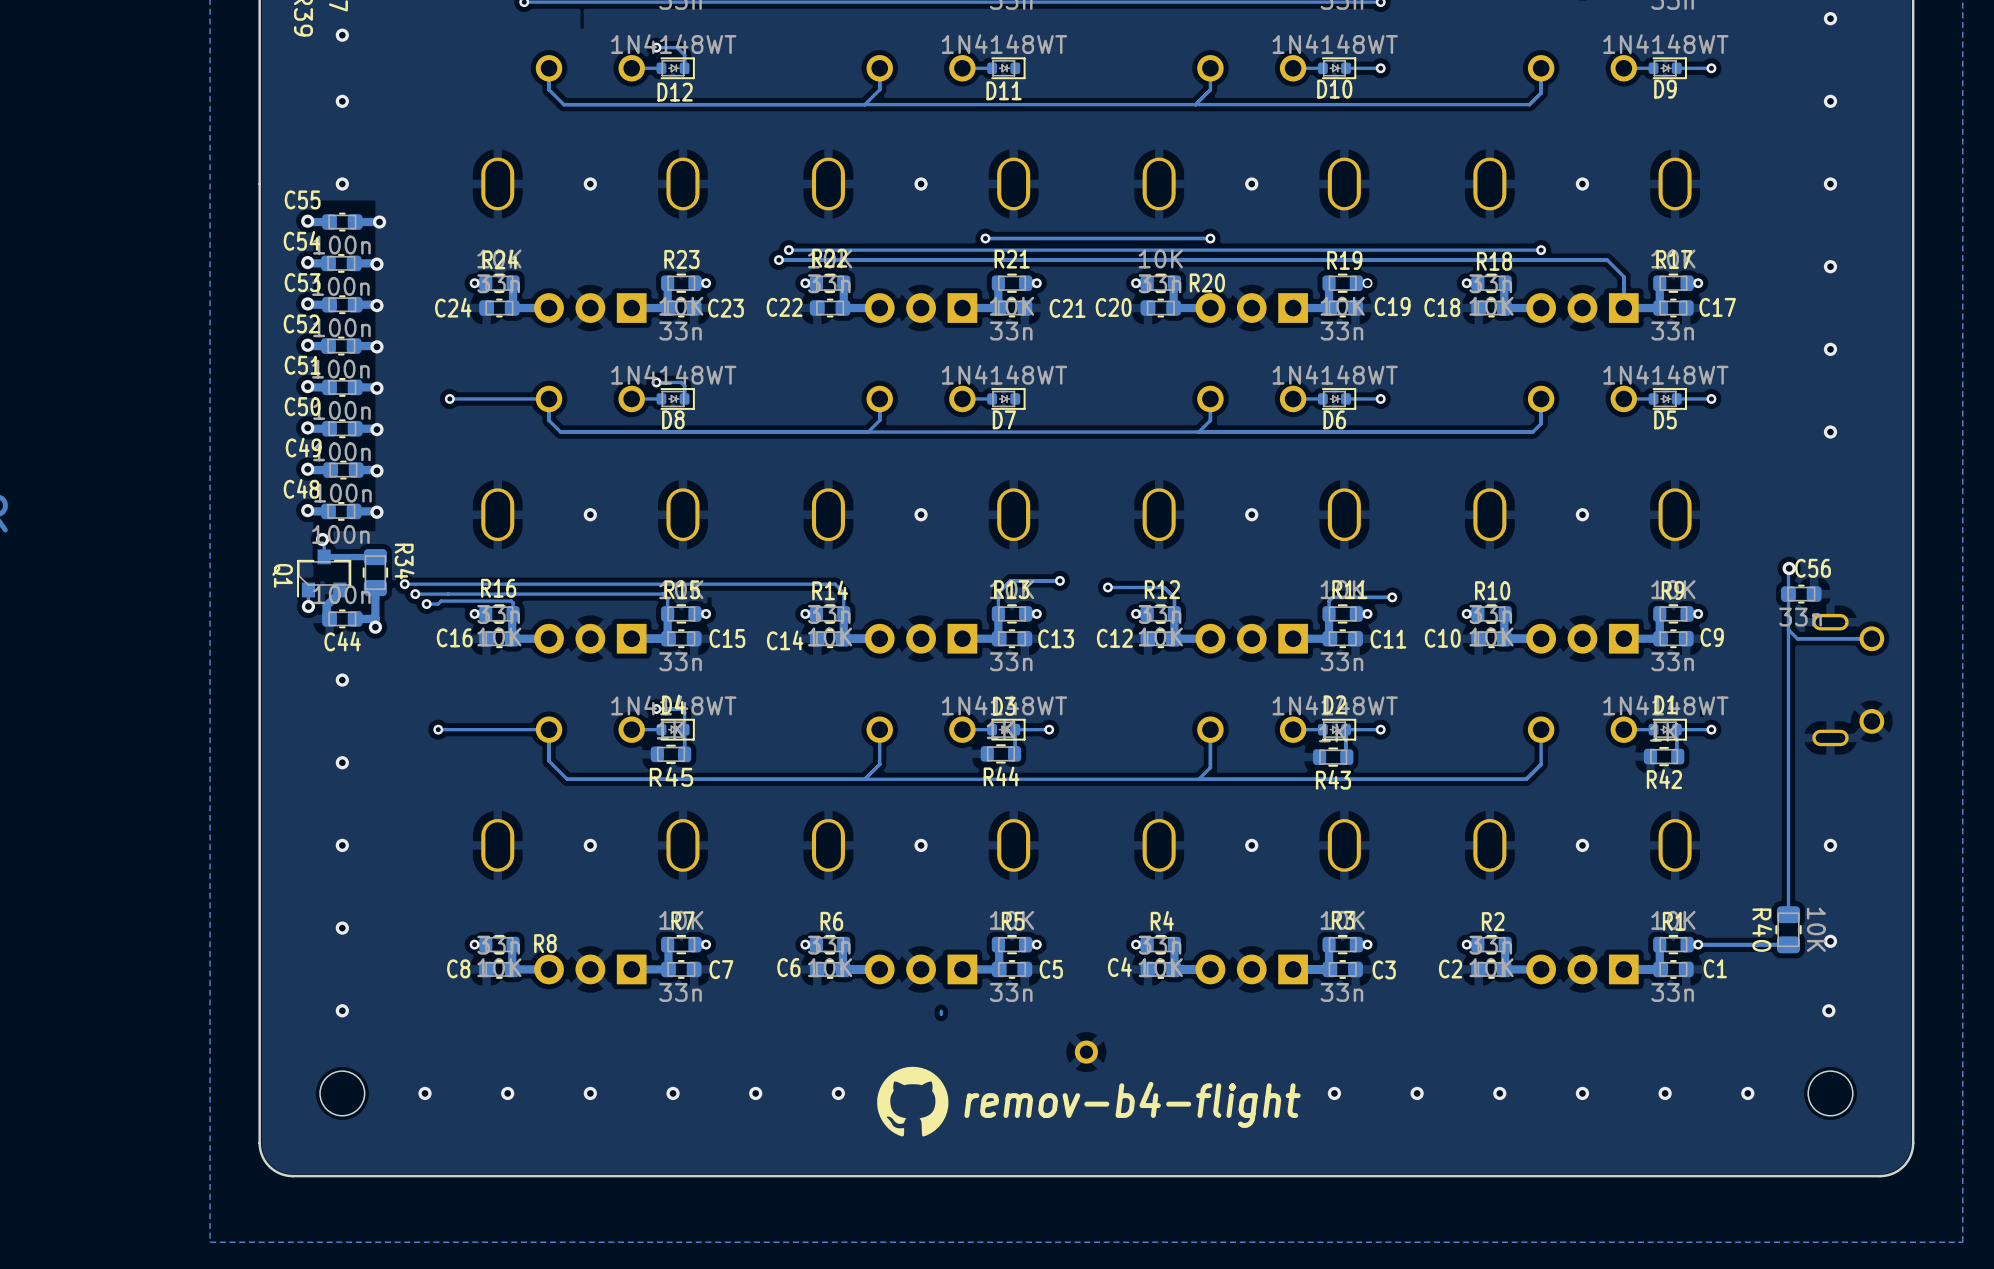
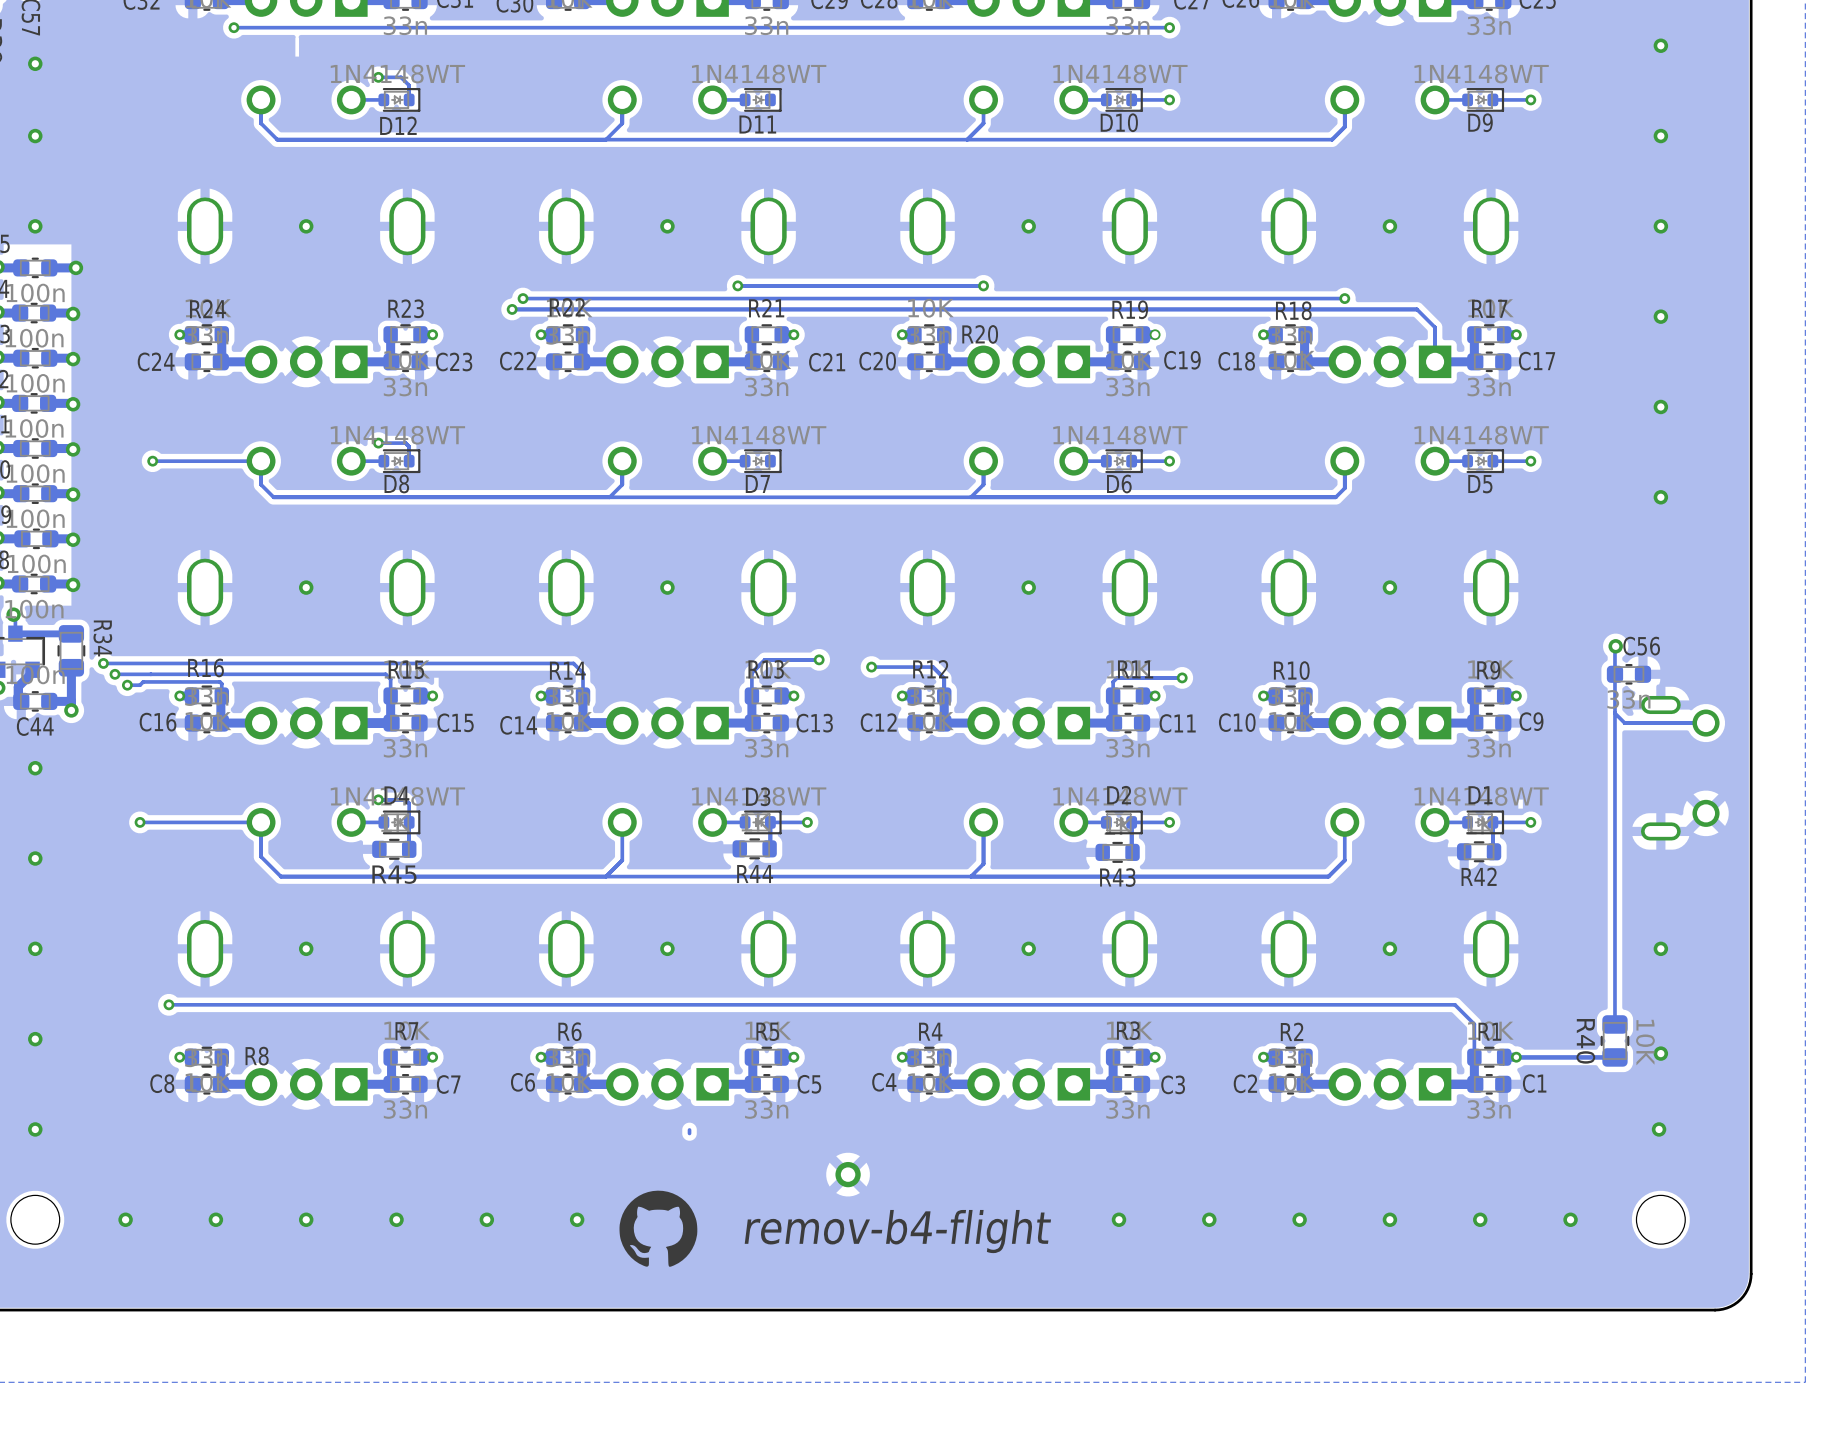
track: none -> (168, 1004) (1454, 1004) (1474, 1024) (1474, 1057)
via: none -> (168, 1004)

